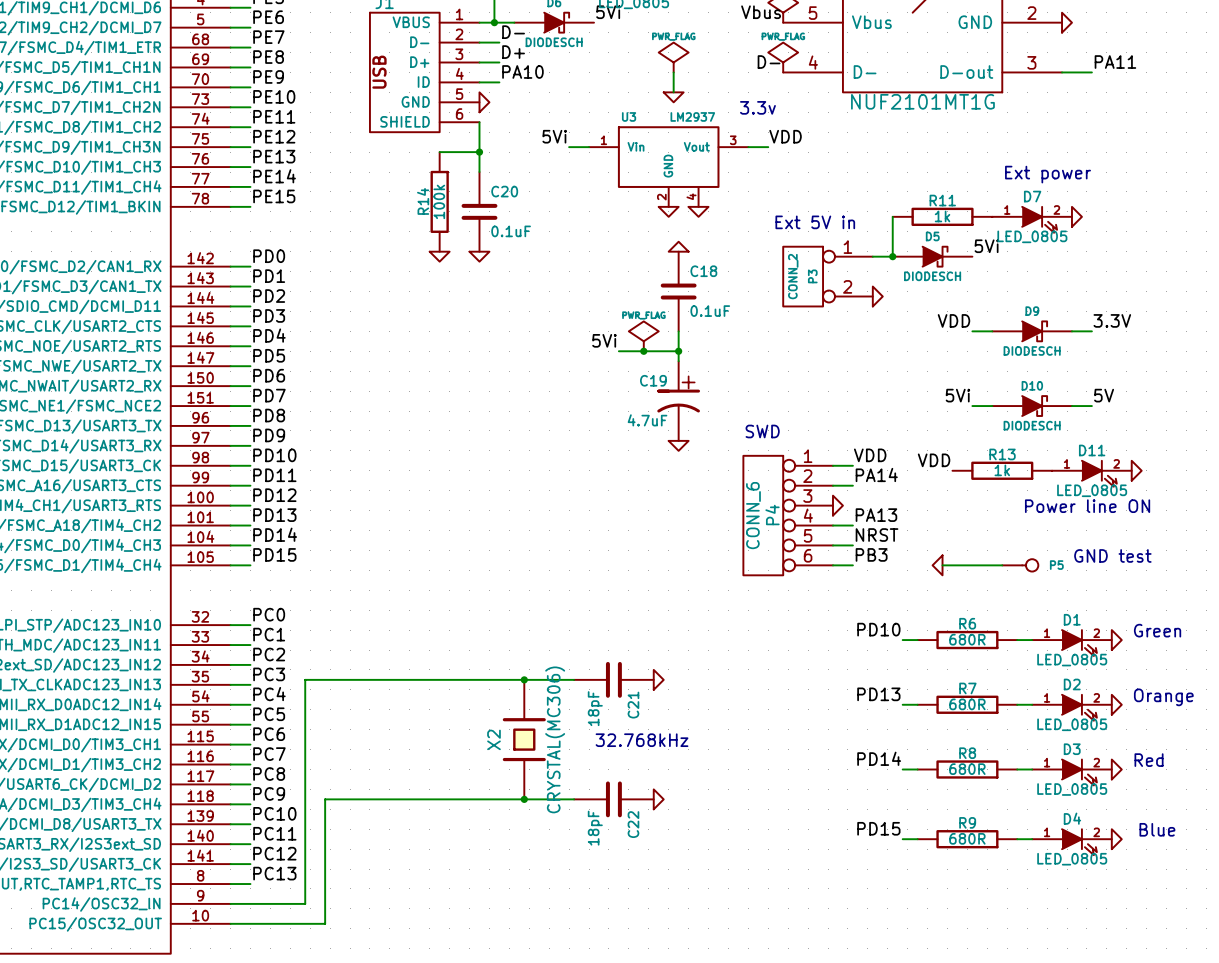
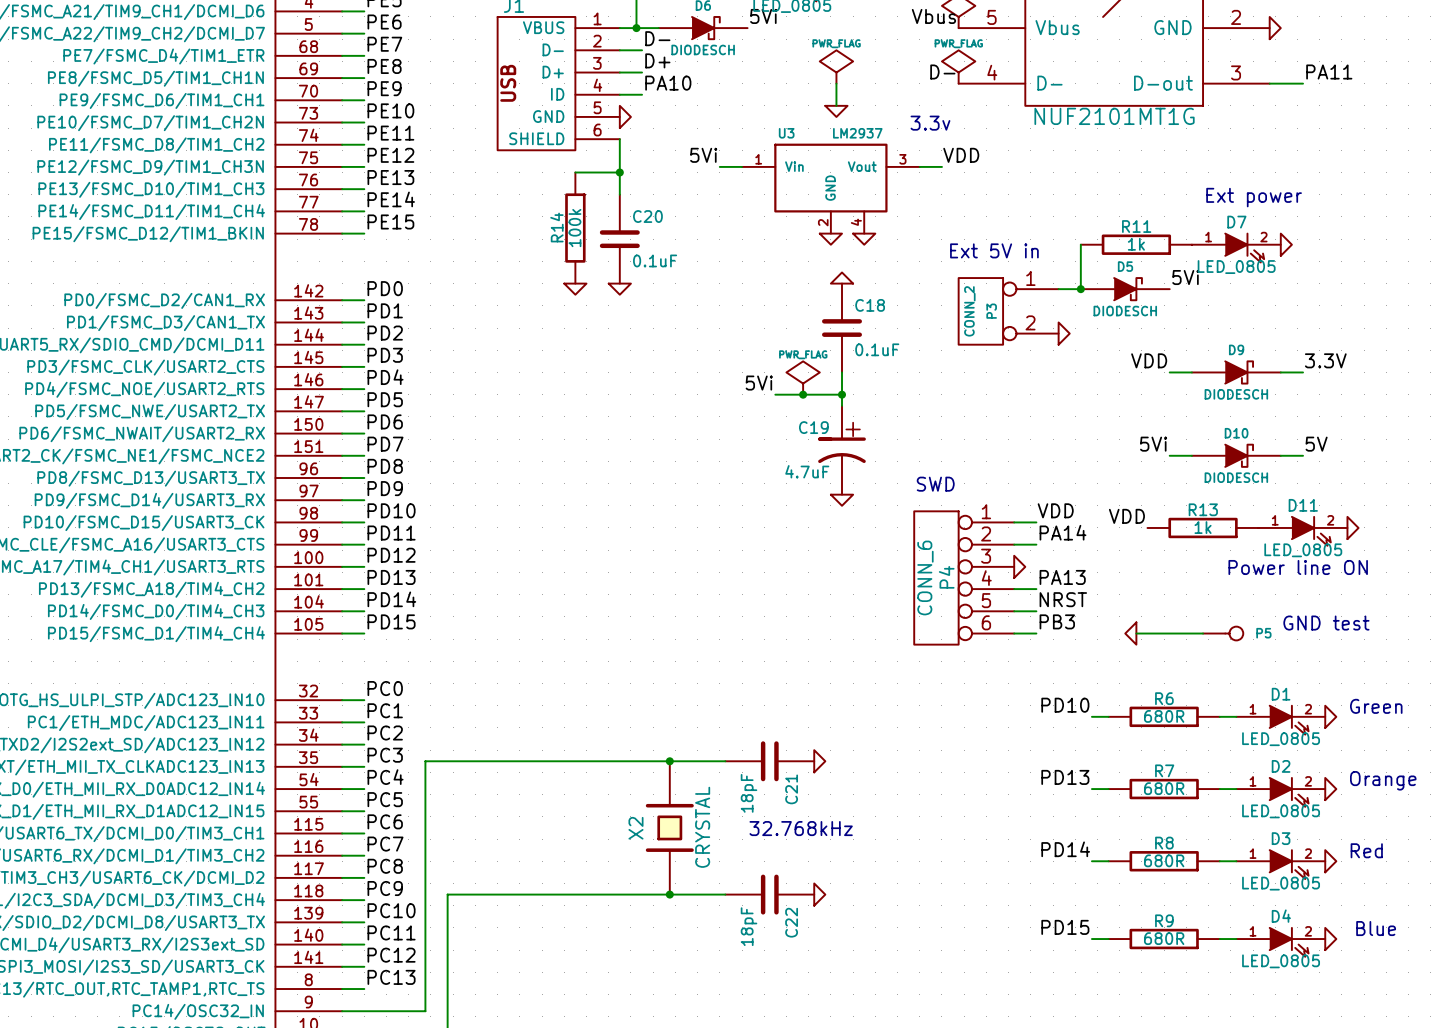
X2 value: CRYSTAL(MC306) (555, 739) -> CRYSTAL (702, 827)

